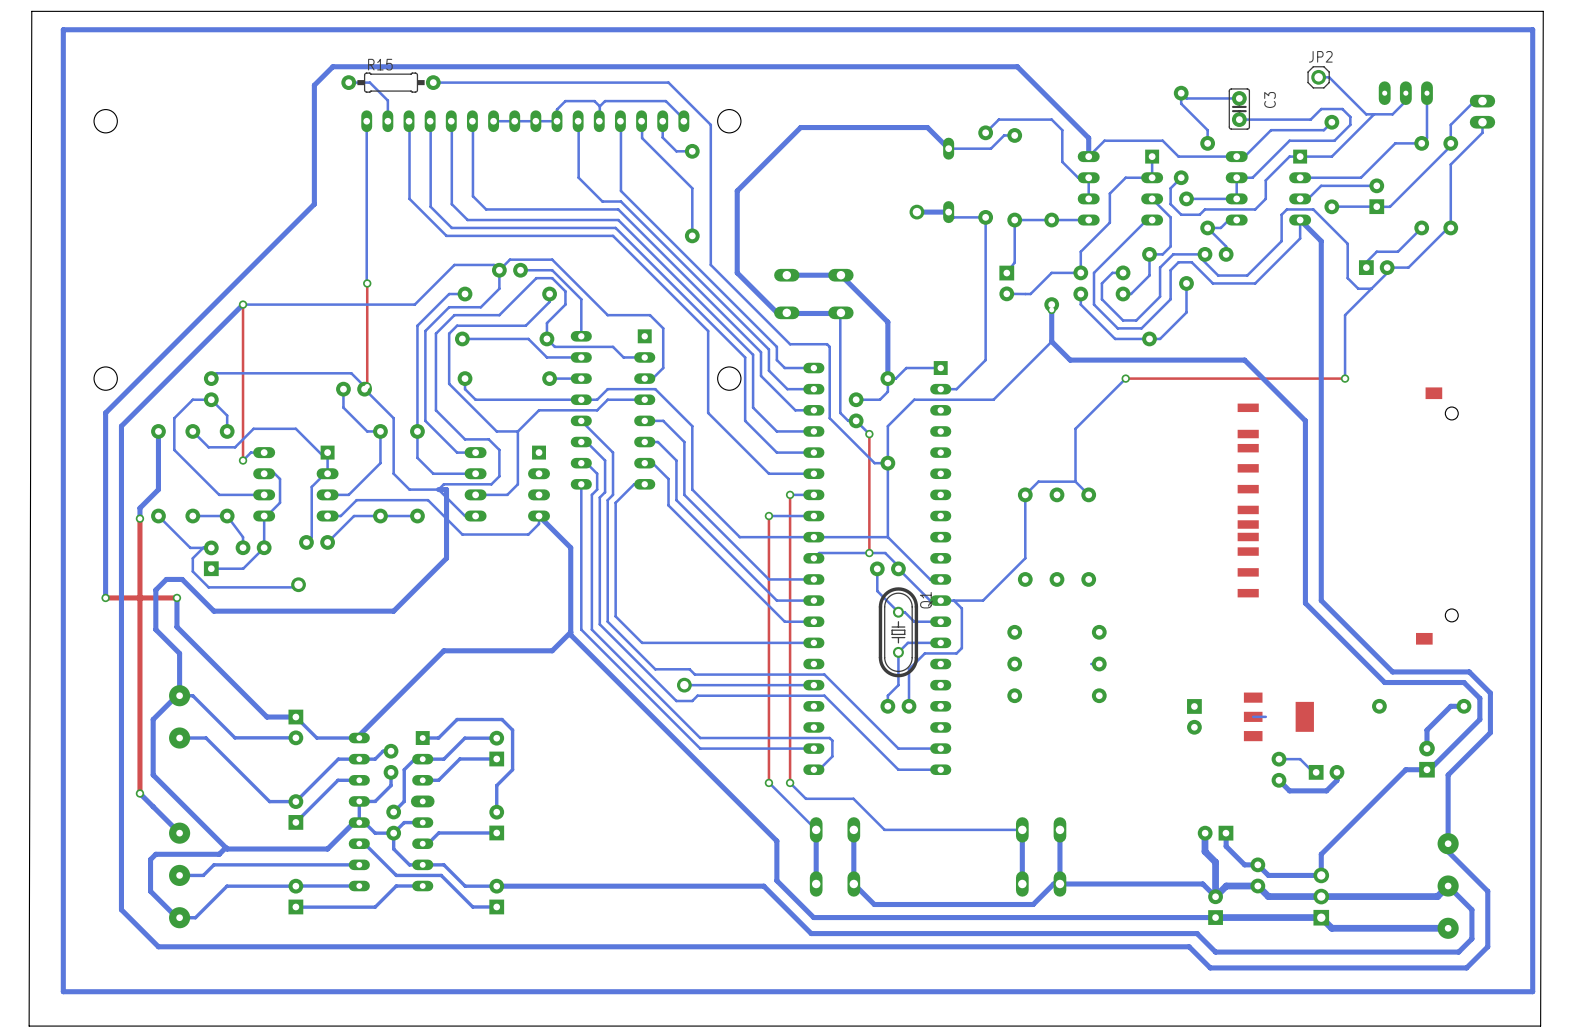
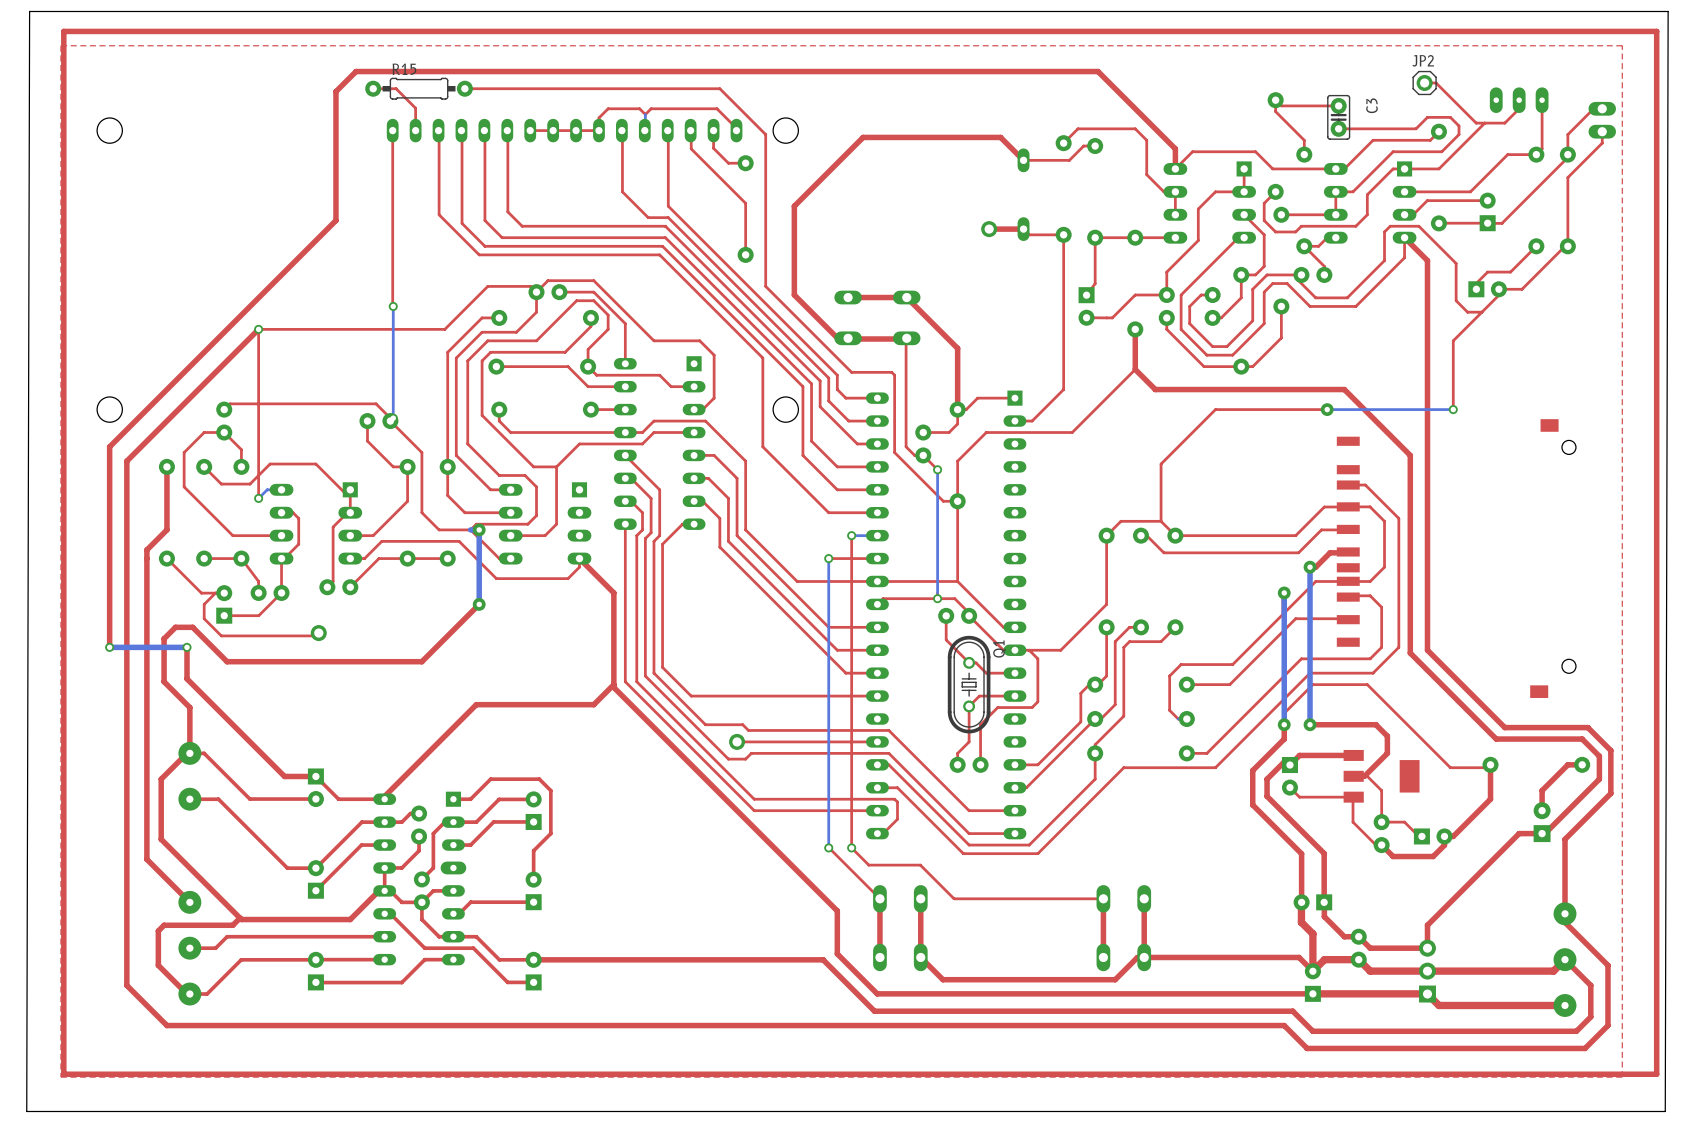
bottom track: (1532, 29) (63, 29) (63, 991) (1532, 991) (1532, 29) -> none
top track: none -> (1656, 31) (63, 31) (63, 1074) (1656, 1074) (1656, 31)
top zone outline: none -> (1622, 45) (60, 45) (60, 1077) (1622, 1077) (1622, 45)
bottom track: (1318, 77) (1329, 77) (1366, 114) (1392, 114) (1408, 98) (1405, 93) -> none
top track: none -> (1424, 83) (1436, 83) (1476, 123) (1504, 123) (1522, 105) (1519, 100)
bottom track: (348, 82) (369, 82) (387, 100) (387, 121) -> none
top track: none -> (373, 88) (396, 88) (415, 108) (415, 130)
bottom track: (433, 82) (668, 82) (710, 124) (710, 264) (790, 344) (827, 344) (829, 346) (829, 418) (874, 463) (887, 463) -> none
top track: none -> (464, 88) (719, 88) (765, 134) (765, 286) (851, 372) (891, 372) (894, 375) (894, 452) (943, 501) (957, 501)
bottom track: (1426, 93) (1426, 138) (1421, 143) (1395, 143) (1360, 177) (1300, 177) -> none
top track: none -> (1542, 100) (1542, 148) (1536, 154) (1507, 154) (1470, 191) (1404, 191)
bottom track: (1239, 98) (1186, 98) (1181, 93) (1181, 103) (1207, 130) (1207, 143) -> none
top track: none -> (1338, 105) (1281, 105) (1275, 100) (1275, 111) (1304, 140) (1304, 154)
bottom track: (1482, 101) (1474, 101) (1450, 124) (1450, 146) (1389, 206) (1331, 206) -> none
top track: none -> (1602, 108) (1593, 108) (1567, 134) (1567, 157) (1501, 223) (1438, 223)
bottom track: (1374, 114) (1331, 156) (1289, 156) (1265, 180) (1265, 198) (1255, 209) (1204, 209) (1199, 214) (1181, 214) (1170, 204) (1170, 188) (1181, 177) -> none
top track: none -> (1484, 123) (1438, 168) (1393, 168) (1367, 194) (1367, 214) (1355, 226) (1301, 226) (1295, 231) (1275, 231) (1264, 220) (1264, 203) (1275, 191)
bottom track: (1239, 119) (1310, 119) (1321, 109) (1342, 109) (1350, 116) (1350, 124) (1334, 140) (1289, 140) (1252, 177) (1236, 177) (1236, 198) (1186, 198) -> none
top track: none -> (1338, 128) (1416, 128) (1427, 117) (1450, 117) (1459, 125) (1459, 134) (1441, 151) (1393, 151) (1353, 191) (1335, 191) (1335, 214) (1281, 214)
bottom track: (366, 121) (367, 283) -> (393, 418) (393, 306)
bottom track: (409, 121) (409, 198) (446, 235) (613, 235) (708, 331) (708, 412) (768, 473) (813, 473) -> none
top track: none -> (438, 130) (439, 214) (479, 254) (659, 254) (762, 358) (762, 446) (828, 512) (877, 512)
bottom track: (430, 121) (430, 206) (451, 227) (615, 227) (745, 357) (745, 420) (776, 452) (813, 452) -> none
top track: none -> (461, 130) (462, 223) (484, 246) (662, 246) (802, 386) (802, 455) (837, 489) (877, 489)
bottom track: (451, 121) (451, 204) (467, 220) (618, 220) (753, 354) (753, 407) (776, 431) (813, 431) -> none
top track: none -> (484, 130) (484, 220) (502, 237) (665, 237) (811, 383) (811, 441) (837, 466) (877, 466)
bottom track: (472, 121) (472, 196) (486, 209) (618, 209) (761, 352) (761, 375) (795, 410) (813, 410) -> none
top track: none -> (507, 130) (507, 211) (522, 226) (665, 226) (820, 380) (820, 406) (857, 443) (877, 443)
bottom track: (578, 121) (578, 177) (602, 201) (620, 201) (768, 349) (768, 370) (787, 389) (813, 389) -> none
top track: none -> (621, 130) (622, 191) (648, 217) (668, 217) (828, 378) (828, 401) (848, 421) (877, 421)
bottom track: (620, 121) (620, 190) (776, 346) (776, 360) (784, 368) (813, 368) -> none
top track: none -> (667, 130) (668, 206) (837, 375) (837, 389) (845, 398) (877, 398)
bottom track: (641, 121) (642, 138) (692, 188) (692, 235) -> none
top track: none -> (690, 130) (691, 148) (745, 203) (745, 254)
bottom track: (662, 121) (662, 137) (676, 151) (692, 151) -> none
top track: none -> (713, 130) (713, 148) (728, 163) (745, 163)
bottom track: (683, 121) (665, 101) (605, 101) (599, 106) (594, 101) (565, 101) (557, 109) (557, 121) (493, 121) -> none
top track: none -> (736, 130) (736, 128) (717, 108) (651, 108) (645, 114) (639, 108) (608, 108) (598, 117) (598, 130) (530, 130)
bottom track: (1331, 122) (1323, 130) (1271, 130) (1244, 156) (1178, 156) (1162, 140) (1104, 140) (1088, 156) (1088, 138) (1017, 66) (332, 66) (314, 85) (314, 204) (105, 412) (105, 597) -> none
top track: none -> (1438, 131) (1430, 140) (1373, 140) (1344, 168) (1272, 168) (1255, 151) (1192, 151) (1175, 168) (1175, 148) (1098, 71) (356, 71) (335, 91) (335, 220) (109, 446) (109, 647)
bottom track: (1482, 122) (1482, 132) (1450, 164) (1450, 227) (1448, 227) (1408, 267) (1387, 267) -> none
top track: none -> (1602, 131) (1602, 143) (1567, 177) (1567, 246) (1565, 246) (1522, 289) (1498, 289)
bottom track: (985, 132) (998, 119) (1051, 119) (1062, 130) (1062, 161) (1078, 177) (1088, 177) (1088, 198) -> none
top track: none -> (1063, 143) (1077, 128) (1135, 128) (1146, 140) (1146, 174) (1163, 191) (1175, 191) (1175, 214)
bottom track: (1014, 135) (1004, 135) (990, 148) (948, 148) (927, 127) (800, 127) (737, 190) (737, 272) (777, 312) (840, 313) -> none
top track: none -> (1095, 146) (1083, 146) (1069, 160) (1023, 160) (1000, 137) (863, 137) (794, 206) (794, 295) (837, 338) (906, 339)
bottom track: (1152, 156) (1152, 177) (1125, 177) (1109, 193) (1109, 222) (1080, 251) (1080, 272) (1051, 272) (1030, 294) (1006, 293) -> none
top track: none -> (1244, 168) (1244, 191) (1215, 191) (1198, 209) (1198, 240) (1166, 272) (1166, 295) (1135, 295) (1112, 317) (1086, 317)
bottom track: (1376, 185) (1321, 185) (1308, 198) (1300, 198) -> none
top track: none -> (1487, 200) (1427, 200) (1413, 214) (1404, 214)
bottom track: (1157, 198) (1152, 198) (1170, 217) (1170, 246) (1162, 254) (1149, 254) (1149, 275) (1131, 294) (1123, 294) -> none
top track: none -> (1249, 214) (1244, 214) (1264, 234) (1264, 266) (1255, 274) (1241, 274) (1241, 297) (1221, 317) (1212, 317)
bottom track: (916, 212) (948, 212) (953, 217) (985, 217) (985, 360) (956, 389) (940, 389) -> none
top track: none -> (989, 229) (1023, 229) (1029, 234) (1063, 234) (1063, 389) (1032, 421) (1014, 421)
bottom track: (1088, 220) (1014, 220) (1014, 262) (1006, 273) -> none
top track: none -> (1175, 237) (1095, 237) (1095, 283) (1086, 295)
bottom track: (1152, 220) (1146, 220) (1094, 272) (1094, 304) (1117, 328) (1141, 328) (1170, 299) (1170, 270) (1178, 262) (1191, 262) (1212, 283) (1255, 283) (1300, 238) (1300, 220) (1321, 241) (1321, 600) (1392, 671) (1469, 671) (1490, 693) (1490, 732) (1448, 775) (1448, 851) (1487, 891) (1487, 946) (1466, 967) (1210, 967) (1189, 946) (158, 946) (121, 909) (121, 426) (243, 304) (414, 304) (454, 264) (494, 264) (499, 270) -> none
top track: none -> (1244, 237) (1238, 237) (1181, 295) (1181, 329) (1206, 355) (1232, 355) (1264, 323) (1264, 292) (1272, 283) (1287, 283) (1310, 306) (1355, 306) (1404, 257) (1404, 237) (1427, 260) (1427, 650) (1504, 727) (1587, 727) (1610, 750) (1610, 793) (1565, 839) (1565, 922) (1607, 965) (1607, 1025) (1585, 1048) (1307, 1048) (1284, 1025) (166, 1025) (126, 985) (126, 461) (258, 329) (444, 329) (487, 286) (530, 286) (536, 292)
bottom track: (1236, 220) (1228, 220) (1220, 227) (1207, 227) (1226, 246) (1226, 254) -> none
top track: none -> (1335, 237) (1327, 237) (1318, 246) (1304, 246) (1324, 266) (1324, 274)
bottom track: (1421, 227) (1397, 251) (1376, 251) (1363, 264) -> none
top track: none -> (1536, 246) (1510, 272) (1487, 272) (1473, 286)
bottom track: (1202, 254) (1202, 259) (1218, 275) (1247, 275) (1281, 241) (1281, 214) (1286, 209) (1313, 209) (1347, 243) (1347, 278) (1358, 288) (1371, 288) -> none
top track: none -> (1298, 274) (1298, 280) (1315, 297) (1347, 297) (1384, 260) (1384, 231) (1390, 226) (1418, 226) (1456, 263) (1456, 300) (1467, 312) (1481, 312)
bottom track: (1204, 254) (1173, 254) (1160, 267) (1160, 296) (1136, 320) (1123, 320) (1101, 299) (1101, 283) (1112, 272) (1123, 272) -> none
top track: none -> (1301, 274) (1267, 274) (1252, 289) (1252, 320) (1226, 346) (1212, 346) (1189, 323) (1189, 306) (1201, 295) (1212, 295)
bottom track: (1392, 267) (1345, 315) (1345, 378) -> (1327, 409) (1453, 409)
bottom track: (499, 270) (509, 259) (552, 259) (607, 315) (650, 315) (663, 328) (663, 368) (652, 378) (644, 378) -> none
bottom track: (499, 270) (499, 288) (480, 307) (449, 307) (425, 331) (425, 420) (457, 452) (475, 452) -> none
top track: none -> (536, 292) (547, 280) (593, 280) (653, 340) (699, 340) (714, 355) (714, 398) (702, 409) (694, 409)
top track: none -> (536, 292) (536, 312) (516, 332) (482, 332) (456, 358) (456, 455) (490, 489) (510, 489)
bottom track: (520, 270) (552, 270) (581, 299) (581, 336) -> none
top track: none -> (559, 292) (593, 292) (625, 323) (625, 363)
bottom track: (786, 275) (840, 275) (887, 322) (887, 378) -> none
top track: none -> (848, 297) (906, 297) (957, 348) (957, 409)
top track: (367, 283) (367, 386) -> (393, 306) (392, 130)
bottom track: (1186, 283) (1186, 312) (1160, 338) (1115, 338) (1080, 304) (1080, 294) -> none
top track: none -> (1281, 306) (1281, 337) (1252, 366) (1204, 366) (1166, 329) (1166, 317)
bottom track: (465, 294) (449, 294) (417, 325) (417, 457) (433, 473) (475, 473) -> none
top track: none -> (499, 317) (482, 317) (447, 352) (447, 495) (464, 512) (510, 512)
bottom track: (549, 294) (549, 301) (525, 325) (457, 325) (449, 333) (449, 383) (496, 431) (517, 431) -> none
top track: none -> (590, 317) (590, 326) (565, 352) (490, 352) (482, 360) (482, 415) (533, 466) (556, 466)
bottom track: (1051, 309) (1051, 341) -> none
via: (1051, 309) -> none
bottom track: (840, 313) (840, 412) (848, 420) (856, 420) (869, 434) -> (937, 592) (937, 469)
bottom track: (462, 338) (528, 338) (546, 357) (581, 357) -> none
top track: none -> (496, 366) (568, 366) (588, 386) (625, 386)
bottom track: (1051, 341) (993, 399) (914, 399) (887, 426) (887, 537) -> none
bottom track: (1051, 341) (1070, 360) (1244, 360) (1305, 420) (1305, 603) (1384, 682) (1463, 682) (1479, 698) (1479, 719) (1429, 769) (1405, 769) (1321, 854) (1321, 875) (1268, 875) (1257, 864) (1244, 864) (1226, 846) (1225, 833) -> none
top track: none -> (1135, 369) (1072, 432) (986, 432) (957, 461) (957, 581)
top track: none -> (1135, 369) (1135, 335) (1135, 369)
top track: none -> (1135, 369) (1155, 389) (1344, 389) (1410, 455) (1410, 653) (1496, 739) (1582, 739) (1599, 756) (1599, 779) (1544, 833) (1519, 833) (1427, 925) (1427, 948) (1370, 948) (1358, 936) (1344, 936) (1324, 916) (1324, 853) (1267, 796) (1267, 779) (1284, 761) (1289, 765) (1299, 755) (1353, 755)
bottom track: (644, 357) (623, 357) (613, 346) (554, 346) (546, 338) (546, 323) (565, 304) (565, 291) (552, 278) (536, 278) (499, 315) (454, 315) (435, 333) (435, 410) (465, 439) (488, 439) (499, 449) (499, 476) (491, 484) (443, 484) (438, 489) -> none
top track: none -> (694, 386) (671, 386) (659, 375) (596, 375) (588, 366) (588, 349) (608, 329) (608, 315) (593, 300) (576, 300) (536, 340) (487, 340) (467, 360) (467, 443) (499, 475) (525, 475) (536, 486) (536, 515) (527, 524) (476, 524) (470, 529)
bottom track: (940, 368) (906, 368) (895, 378) (887, 378) -> none
top track: none -> (1014, 398) (977, 398) (966, 409) (957, 409)
bottom track: (211, 378) (216, 373) (351, 373) (393, 418) (393, 473) (409, 489) (438, 489) -> none
top track: none -> (224, 409) (229, 403) (376, 403) (421, 452) (421, 512) (439, 529) (470, 529)
bottom track: (465, 378) (465, 389) (475, 399) (597, 399) (607, 389) (655, 389) (692, 426) (692, 489) (739, 537) (887, 537) -> none
top track: none -> (499, 409) (499, 421) (510, 432) (642, 432) (653, 421) (705, 421) (745, 461) (745, 529) (797, 581) (957, 581)
bottom track: (581, 378) (549, 378) -> none
top track: none -> (625, 409) (590, 409)
bottom track: (887, 378) (887, 391) (879, 399) (856, 399) -> none
top track: none -> (957, 409) (957, 423) (949, 432) (923, 432)
bottom track: (1125, 378) (1075, 428) (1075, 481) -> none
top track: none -> (1215, 409) (1161, 464) (1161, 521)
via: (1125, 378) -> none
via: none -> (1327, 409)
top track: (1345, 378) (1228, 378) -> (1453, 409) (1453, 340) (1504, 289)
bottom track: (343, 389) (343, 407) (367, 431) (380, 431) (380, 463) (348, 494) (327, 494) -> none
top track: none -> (367, 421) (367, 441) (393, 466) (407, 466) (407, 501) (373, 535) (350, 535)
bottom track: (644, 399) (607, 399) (597, 410) (539, 410) (517, 431) -> none
top track: none -> (694, 432) (653, 432) (642, 443) (579, 443) (556, 466)
bottom track: (581, 420) (613, 452) (613, 494) (607, 500) (607, 621) (655, 669) (689, 669) (694, 674) (824, 674) (898, 748) (940, 748) -> none
top track: none -> (625, 455) (659, 489) (659, 535) (653, 541) (653, 673) (705, 724) (742, 724) (748, 730) (888, 730) (969, 810) (1014, 810)
bottom track: (644, 420) (663, 420) (684, 442) (684, 494) (768, 579) (813, 579) -> none
top track: none -> (694, 455) (714, 455) (737, 478) (737, 535) (828, 627) (877, 627)
bottom track: (158, 431) (158, 489) (139, 508) (139, 518) -> none
top track: none -> (166, 466) (166, 529) (146, 549) (146, 561) (146, 558)
bottom track: (192, 431) (208, 447) (235, 447) (253, 428) (295, 428) (322, 455) (327, 455) -> none
top track: none -> (204, 466) (221, 484) (250, 484) (270, 464) (315, 464) (344, 492) (350, 492)
bottom track: (227, 431) (227, 415) (211, 399) (192, 399) (174, 418) (174, 449) (219, 494) (264, 494) -> none
top track: none -> (241, 466) (241, 449) (224, 432) (204, 432) (184, 452) (184, 486) (232, 535) (281, 535)
bottom track: (517, 431) (517, 484) (507, 494) (475, 494) -> none
top track: none -> (556, 466) (556, 524) (545, 535) (510, 535)
top track: (869, 434) (869, 547) -> (937, 469) (923, 455) (914, 455) (906, 446) (906, 339)
bottom track: (581, 442) (586, 442) (605, 460) (605, 492) (599, 497) (599, 624) (676, 701) (692, 701) (697, 695) (824, 695) (898, 769) (940, 769) -> none
top track: none -> (625, 478) (631, 478) (651, 498) (651, 532) (645, 538) (645, 676) (728, 759) (745, 759) (751, 753) (888, 753) (969, 833) (1014, 833)
bottom track: (644, 442) (657, 442) (676, 460) (676, 500) (776, 600) (813, 600) -> none
top track: none -> (694, 478) (708, 478) (728, 498) (728, 541) (837, 650) (877, 650)
top track: none -> (1348, 485) (1365, 485) (1398, 518) (1398, 647) (1373, 673) (1310, 673) (1215, 767) (1123, 767) (1037, 853) (963, 853) (897, 787) (877, 787)
bottom track: (327, 452) (327, 473) (324, 473) (311, 486) (311, 537) (306, 542) -> none
top track: none -> (350, 489) (350, 512) (347, 512) (333, 527) (333, 581) (327, 587)
bottom track: (581, 463) (586, 463) (597, 473) (597, 489) (591, 494) (591, 629) (700, 738) (829, 738) (832, 740) (832, 756) (819, 769) (813, 769) -> none
top track: none -> (625, 501) (631, 501) (642, 512) (642, 529) (636, 535) (636, 681) (754, 799) (894, 799) (897, 802) (897, 819) (883, 833) (877, 833)
bottom track: (644, 463) (652, 463) (668, 479) (668, 505) (784, 621) (813, 621) -> none
top track: none -> (694, 501) (702, 501) (719, 518) (719, 547) (845, 673) (877, 673)
bottom track: (264, 473) (274, 473) (280, 479) (280, 502) (266, 516) (264, 516) (264, 547) (243, 568) (211, 568) -> none
top track: none -> (281, 512) (293, 512) (298, 518) (298, 544) (284, 558) (281, 558) (281, 592) (258, 615) (224, 615)
bottom track: (1075, 481) (1038, 481) (1025, 494) (1025, 558) (983, 600) (930, 600) (885, 553) (819, 553) (813, 558) -> none
bottom track: (1075, 481) (1088, 494) -> none
top track: none -> (1161, 521) (1120, 521) (1106, 535) (1106, 604) (1060, 650) (1003, 650) (954, 598) (883, 598) (877, 604)
top track: none -> (1161, 521) (1175, 535) (1295, 535) (1324, 507) (1348, 506) (1370, 506) (1384, 521) (1384, 567) (1370, 581) (1315, 581) (1232, 664) (1181, 664) (1169, 676) (1169, 710) (1178, 719) (1186, 719)
bottom track: (581, 484) (581, 629) (700, 748) (813, 748) -> none
top track: none -> (625, 524) (625, 681) (754, 810) (877, 810)
bottom track: (644, 484) (634, 484) (615, 502) (615, 616) (642, 642) (813, 642) -> none
top track: none -> (694, 524) (682, 524) (662, 544) (662, 667) (691, 696) (877, 696)
bottom track: (438, 489) (465, 516) (475, 516) -> none
top track: none -> (470, 529) (499, 558) (510, 558)
via: none -> (479, 529)
top track: none -> (1348, 529) (1321, 529) (1298, 552) (1163, 552) (1146, 535) (1141, 535)
top track: none -> (1348, 551) (1330, 552) (1315, 567) (1310, 567)
bottom track: (158, 516) (190, 547) (211, 547) -> none
top track: none -> (166, 558) (201, 593) (224, 593)
bottom track: (192, 516) (227, 516) (243, 537) (243, 547) -> none
top track: none -> (204, 558) (241, 558) (258, 581) (258, 592)
bottom track: (327, 516) (340, 516) (356, 500) (428, 500) (462, 534) (528, 534) (539, 523) (539, 516) (570, 547) (570, 634) (776, 841) (776, 880) (813, 917) (1321, 917) (1331, 928) (1448, 928) -> none
top track: none -> (350, 558) (364, 558) (381, 541) (459, 541) (496, 578) (568, 578) (579, 567) (579, 558) (613, 592) (613, 687) (837, 910) (837, 953) (877, 993) (1427, 993) (1438, 1005) (1565, 1005)
bottom track: (417, 516) (354, 516) (327, 542) -> none
top track: none -> (447, 558) (378, 558) (350, 587)
top track: (768, 516) (768, 782) -> (828, 558) (877, 558)
bottom track: (813, 516) (768, 516) -> (828, 847) (828, 558)
via: (139, 518) -> none
bottom track: none -> (1310, 567) (1310, 724)
via: none -> (1310, 567)
bottom track: (887, 537) (930, 579) (940, 579) -> none
top track: none -> (957, 581) (1003, 627) (1014, 627)
bottom track: (203, 547) (192, 558) (192, 571) (208, 587) (295, 587) (298, 584) -> none
top track: none -> (215, 593) (204, 604) (204, 618) (221, 635) (315, 635) (318, 633)
bottom track: none -> (1284, 592) (1284, 724)
via: none -> (1284, 592)
top track: none -> (1348, 597) (1370, 595) (1381, 607) (1381, 647) (1370, 658) (1301, 658) (1206, 753) (1186, 753)
bottom track: (446, 558) (393, 611) (213, 611) (182, 579) (166, 579) (155, 590) (155, 629) (179, 653) (179, 695) -> none
top track: none -> (479, 604) (421, 661) (227, 661) (192, 627) (175, 627) (164, 638) (164, 681) (189, 707) (189, 753)
via: none -> (479, 604)
bottom track: (877, 568) (877, 591) (898, 612) (904, 612) (914, 621) (940, 621) -> none
top track: none -> (946, 615) (946, 639) (969, 662) (975, 662) (986, 673) (1014, 673)
top track: none -> (1348, 619) (1295, 618) (1229, 684) (1186, 684)
top track: none -> (1106, 627) (1106, 676) (1098, 684) (1089, 684) (1080, 693) (1080, 721) (1037, 764) (1014, 764)
top track: none -> (1141, 627) (1129, 627) (1115, 641) (1115, 704) (1100, 719) (1095, 719) (1026, 787) (1014, 787)
top track: none -> (1175, 627) (1161, 641) (1129, 641) (1123, 647) (1123, 716) (1095, 744) (1095, 779) (1029, 845) (969, 845) (888, 764) (877, 764)
bottom track: (176, 597) (176, 627) (266, 717) (295, 717) (316, 738) (359, 738) (359, 735) (443, 650) (552, 650) (570, 632) -> (186, 647) (109, 647)
top track: (176, 597) (105, 597) -> (186, 647) (186, 678) (284, 776) (315, 776) (338, 799) (384, 799) (384, 796) (476, 704) (593, 704) (613, 684)
bottom track: (953, 600) (961, 608) (961, 648) (956, 653) (924, 653) (909, 669) (909, 706) -> none
top track: none -> (1029, 650) (1037, 658) (1037, 701) (1032, 707) (997, 707) (980, 724) (980, 764)
bottom track: (940, 642) (907, 642) (898, 652) (898, 685) (887, 695) (887, 706) -> none
top track: none -> (1014, 696) (979, 696) (969, 706) (969, 741) (957, 753) (957, 764)
via: none -> (1284, 724)
top track: none -> (1310, 724) (1375, 724) (1387, 736) (1387, 753) (1364, 776) (1353, 776) (1367, 776) (1381, 790) (1381, 822) (1404, 822) (1418, 836) (1421, 836)
via: none -> (1310, 724)
bottom track: (813, 685) (684, 685) -> none
top track: none -> (877, 741) (737, 741)
top track: none -> (1490, 764) (1490, 799) (1453, 836) (1444, 836) (1444, 845) (1433, 856) (1393, 856) (1381, 845) (1375, 845) (1353, 822) (1353, 797) (1299, 797) (1289, 787)
bottom track: (1463, 706) (1450, 706) (1426, 730) (1426, 748) -> none
top track: none -> (1582, 764) (1567, 764) (1542, 790) (1542, 810)
top track: none -> (1490, 767) (1450, 767) (1367, 684) (1312, 684) (1284, 713) (1284, 739) (1252, 770) (1252, 804) (1301, 853) (1301, 922) (1312, 933) (1312, 971)
bottom track: (1265, 716) (1253, 716) -> none
bottom track: (295, 737) (234, 737) (192, 695) (176, 695) (153, 719) (153, 775) (227, 849) (327, 849) (354, 822) (359, 822) -> none
top track: none -> (315, 799) (249, 799) (204, 753) (186, 753) (161, 779) (161, 839) (241, 919) (350, 919) (378, 890) (384, 890)
bottom track: (179, 738) (206, 738) (269, 801) (295, 801) (338, 759) (375, 759) (383, 751) (391, 751) -> none
top track: none -> (189, 799) (218, 799) (287, 868) (315, 868) (361, 822) (401, 822) (410, 813) (419, 813)
bottom track: (422, 738) (438, 738) (457, 719) (502, 719) (512, 730) (512, 769) (496, 785) (496, 812) -> none
top track: none -> (453, 799) (470, 799) (490, 779) (539, 779) (550, 790) (550, 833) (533, 850) (533, 879)
bottom track: (496, 738) (464, 738) (443, 759) (414, 759) (404, 769) (404, 801) (393, 812) -> none
top track: none -> (533, 799) (499, 799) (476, 822) (444, 822) (433, 833) (433, 867) (421, 879)
bottom track: (496, 758) (459, 758) (438, 780) (422, 780) -> none
top track: none -> (533, 821) (493, 821) (470, 845) (453, 845)
bottom track: (1278, 759) (1300, 759) (1313, 772) (1316, 772) -> none
bottom track: (391, 772) (391, 785) (375, 801) (359, 801) (359, 822) -> none
top track: none -> (419, 836) (419, 850) (401, 867) (384, 867) (384, 890)
bottom track: (1336, 772) (1336, 780) (1326, 790) (1289, 790) (1278, 780) -> none
bottom track: (359, 780) (338, 780) (295, 822) -> none
top track: none -> (384, 845) (361, 845) (315, 890)
bottom track: (768, 782) (816, 829) (816, 884) -> none
top track: none -> (828, 847) (879, 898) (879, 957)
bottom track: (790, 782) (805, 798) (853, 798) (884, 829) (1022, 829) (1022, 884) -> none
top track: none -> (851, 847) (868, 865) (920, 865) (954, 898) (1103, 898) (1103, 957)
bottom track: (139, 793) (179, 833) -> none
top track: none -> (146, 859) (189, 902) (161, 873)
via: (139, 793) -> none
bottom track: (359, 822) (361, 825) (367, 825) (375, 833) (393, 833) -> none
top track: none -> (384, 890) (387, 893) (393, 893) (401, 902) (421, 902)
bottom track: (422, 822) (404, 822) (393, 833) -> none
top track: none -> (453, 890) (433, 890) (421, 902)
bottom track: (853, 829) (853, 884) (874, 904) (1033, 904) (1053, 884) (1202, 884) (1215, 896) -> none
top track: none -> (920, 898) (920, 957) (942, 979) (1115, 979) (1137, 957) (1299, 957) (1312, 971)
bottom track: (1059, 829) (1059, 884) -> none
top track: none -> (1144, 898) (1144, 957)
bottom track: (496, 832) (438, 832) (428, 843) (422, 843) -> none
top track: none -> (533, 902) (470, 902) (459, 913) (453, 913)
bottom track: (393, 833) (393, 849) (409, 864) (443, 864) (465, 886) (763, 886) (811, 933) (1197, 933) (1215, 952) (1458, 952) (1471, 938) (1471, 909) (1448, 886) (1437, 896) (1268, 896) (1257, 886) (1226, 886) (1215, 896) -> none
top track: none -> (421, 902) (421, 919) (439, 936) (476, 936) (499, 959) (823, 959) (874, 1011) (1292, 1011) (1312, 1031) (1576, 1031) (1590, 1016) (1590, 985) (1565, 959) (1553, 971) (1370, 971) (1358, 959) (1324, 959) (1312, 971)
bottom track: (1205, 833) (1204, 851) (1215, 862) (1215, 896) -> none
bottom track: (359, 843) (364, 843) (396, 875) (441, 875) (472, 906) (496, 906) -> none
top track: none -> (384, 913) (390, 913) (424, 948) (473, 948) (507, 982) (533, 982)
bottom track: (225, 847) (219, 854) (155, 854) (150, 859) (150, 891) (176, 917) (195, 917) (227, 886) (359, 886) -> none
top track: none -> (239, 918) (232, 925) (164, 925) (158, 931) (158, 965) (186, 994) (207, 994) (241, 959) (384, 959)
bottom track: (359, 864) (213, 864) (203, 875) (179, 875) -> none
top track: none -> (384, 936) (227, 936) (215, 948) (189, 948)
bottom track: (422, 886) (396, 886) (375, 907) (295, 906) -> none
top track: none -> (453, 959) (424, 959) (401, 982) (315, 982)

